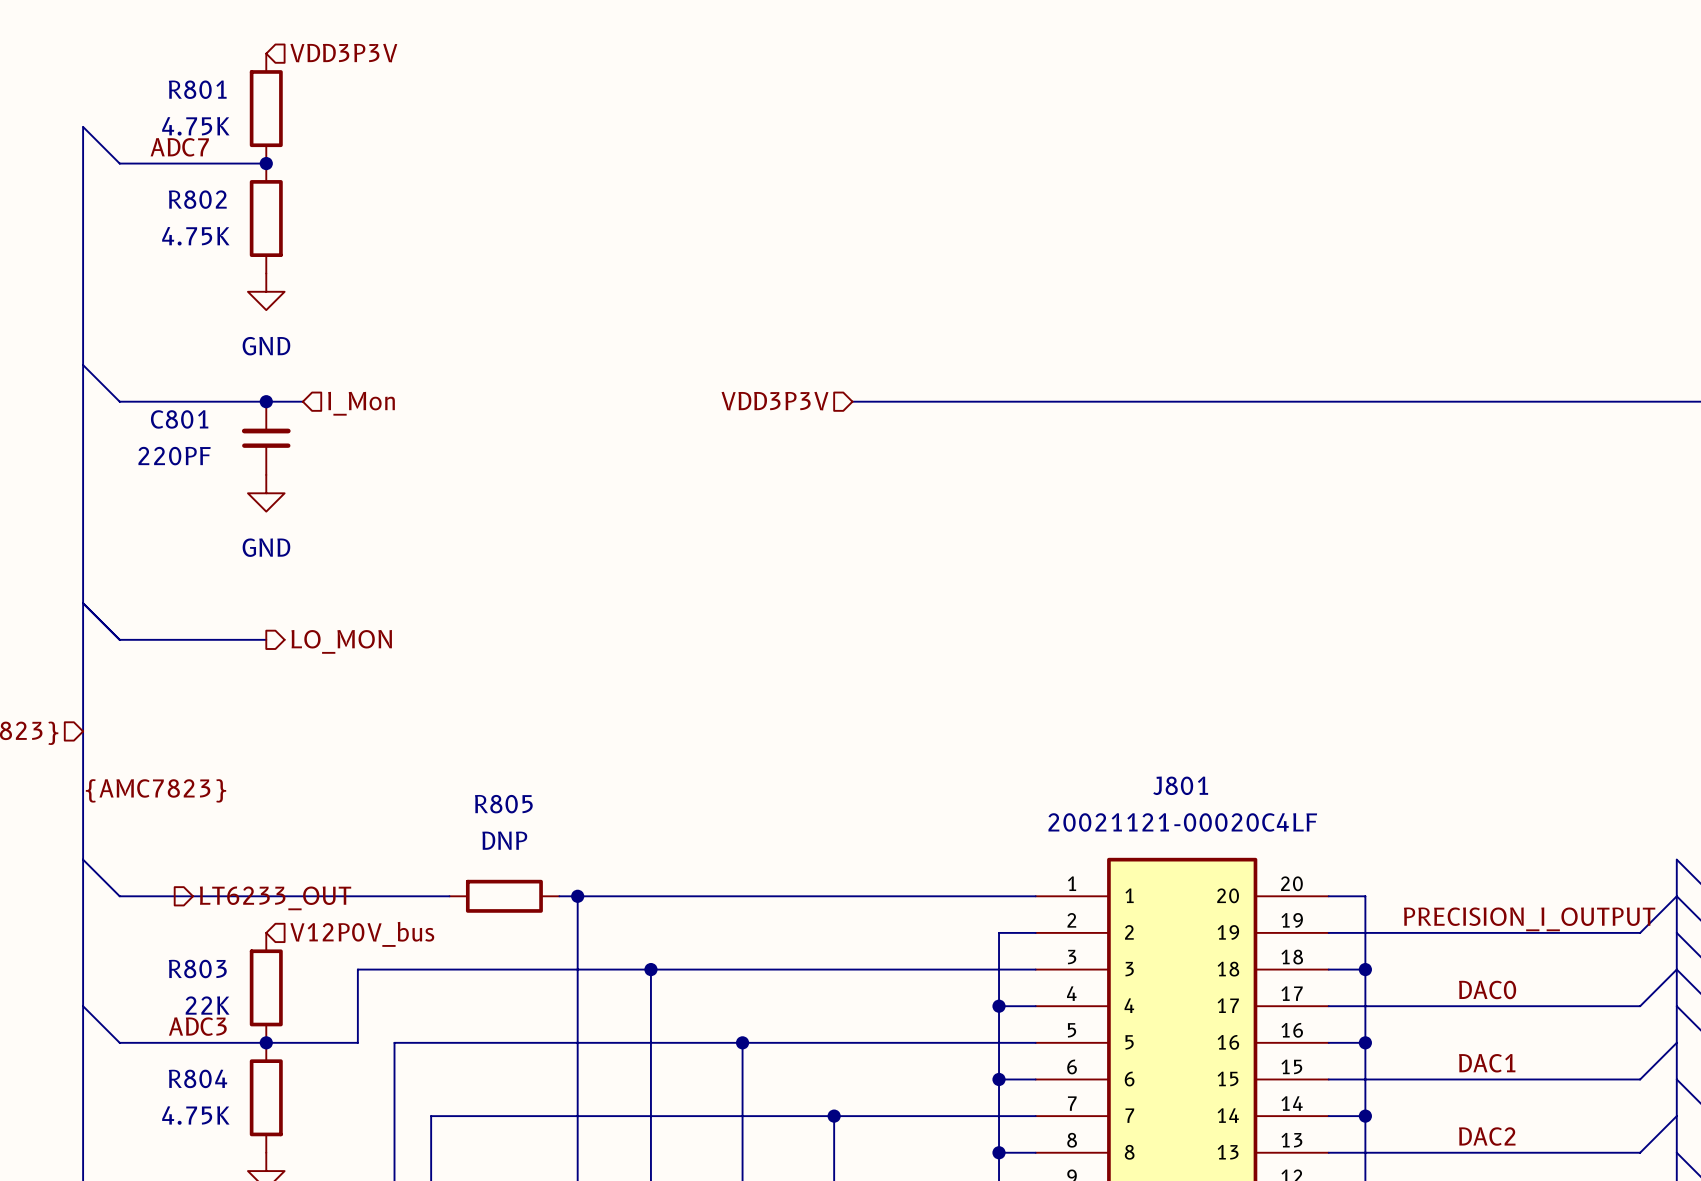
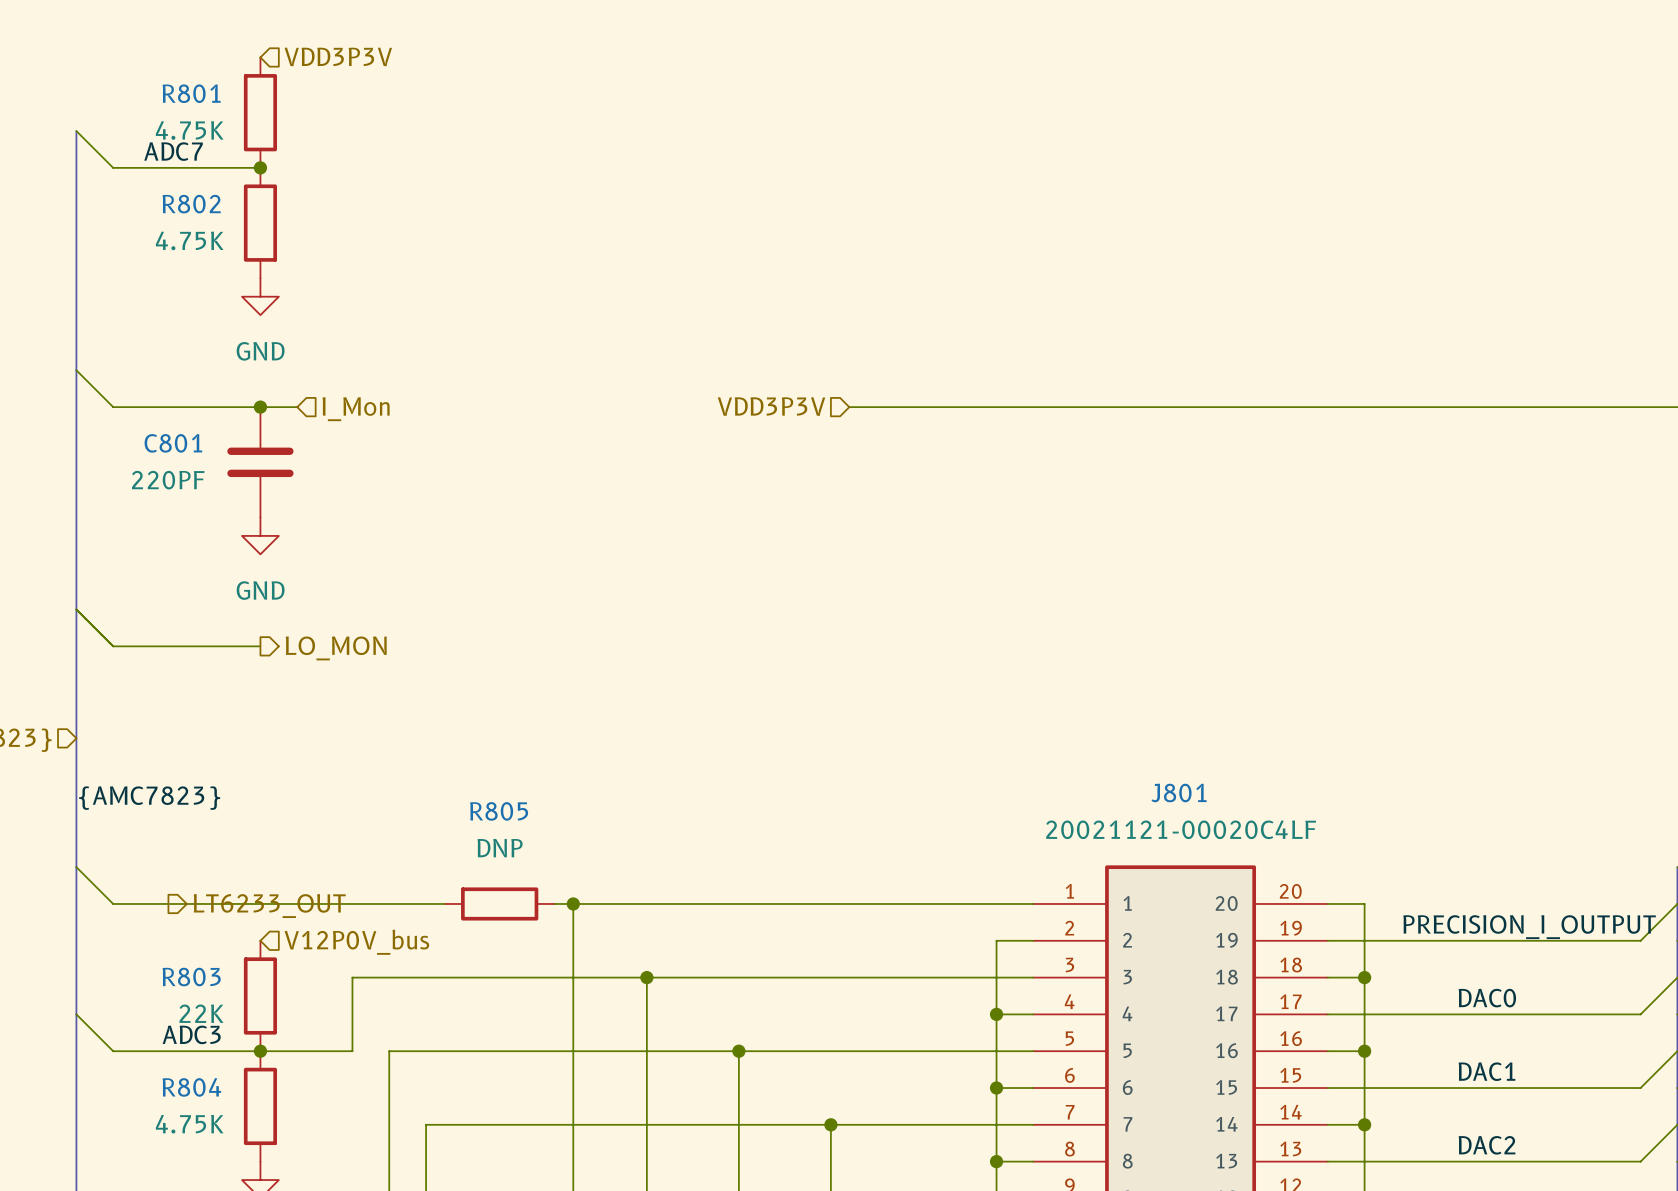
C801 symbol: [241, 401, 291, 475] -> [227, 407, 294, 518]
power symbol position: GND (266, 493) -> GND (260, 535)

